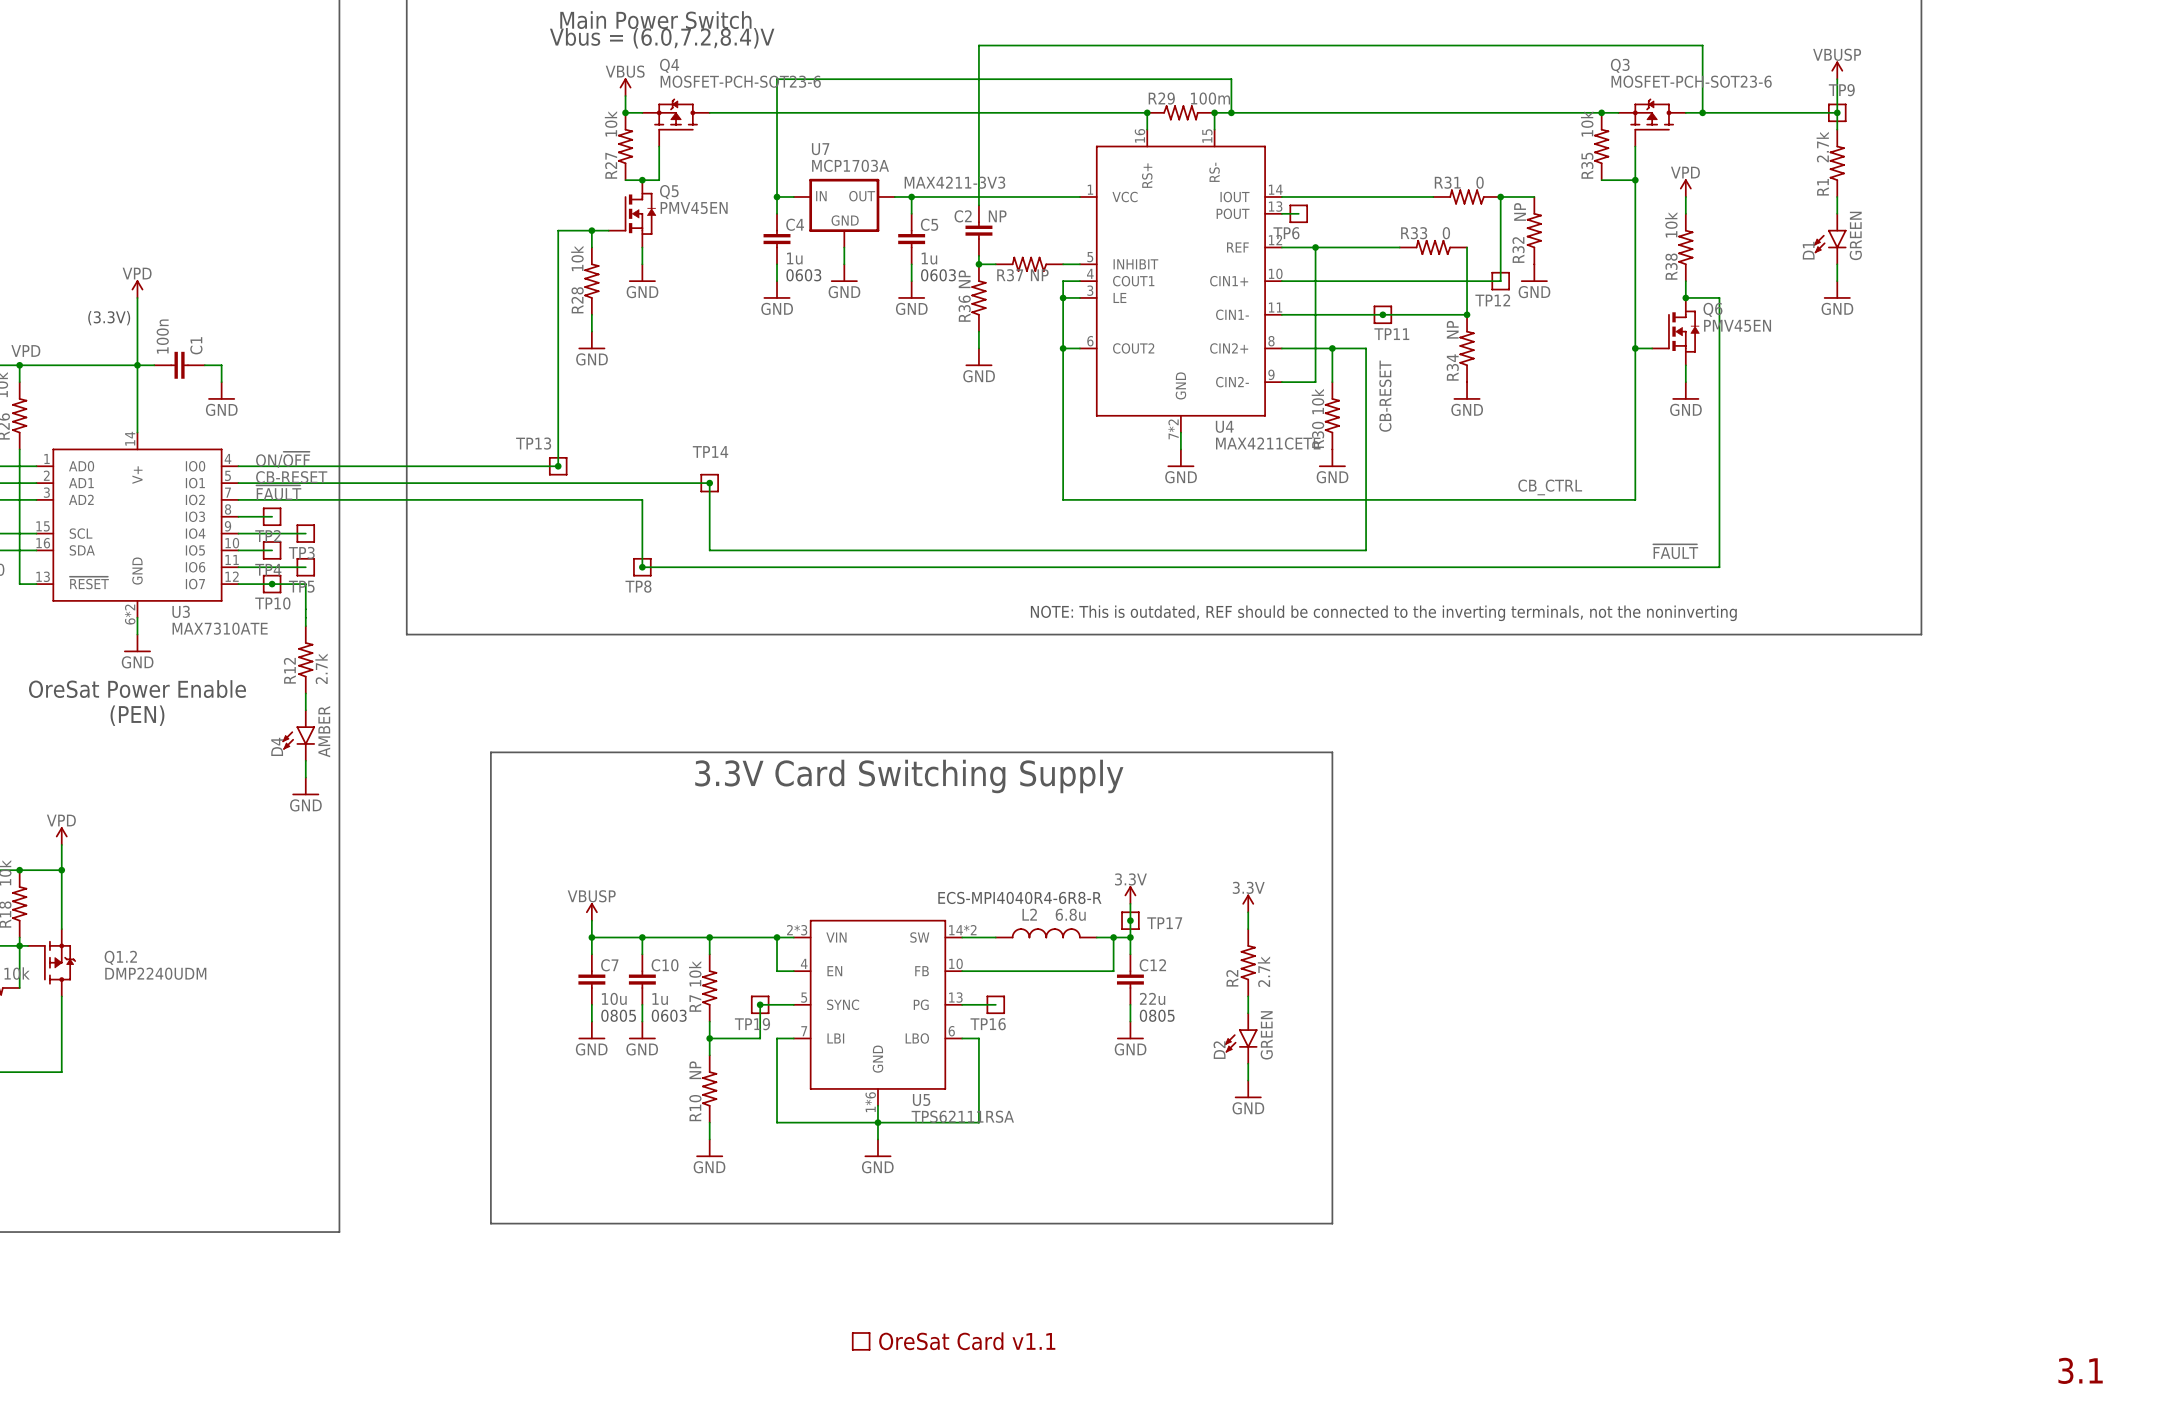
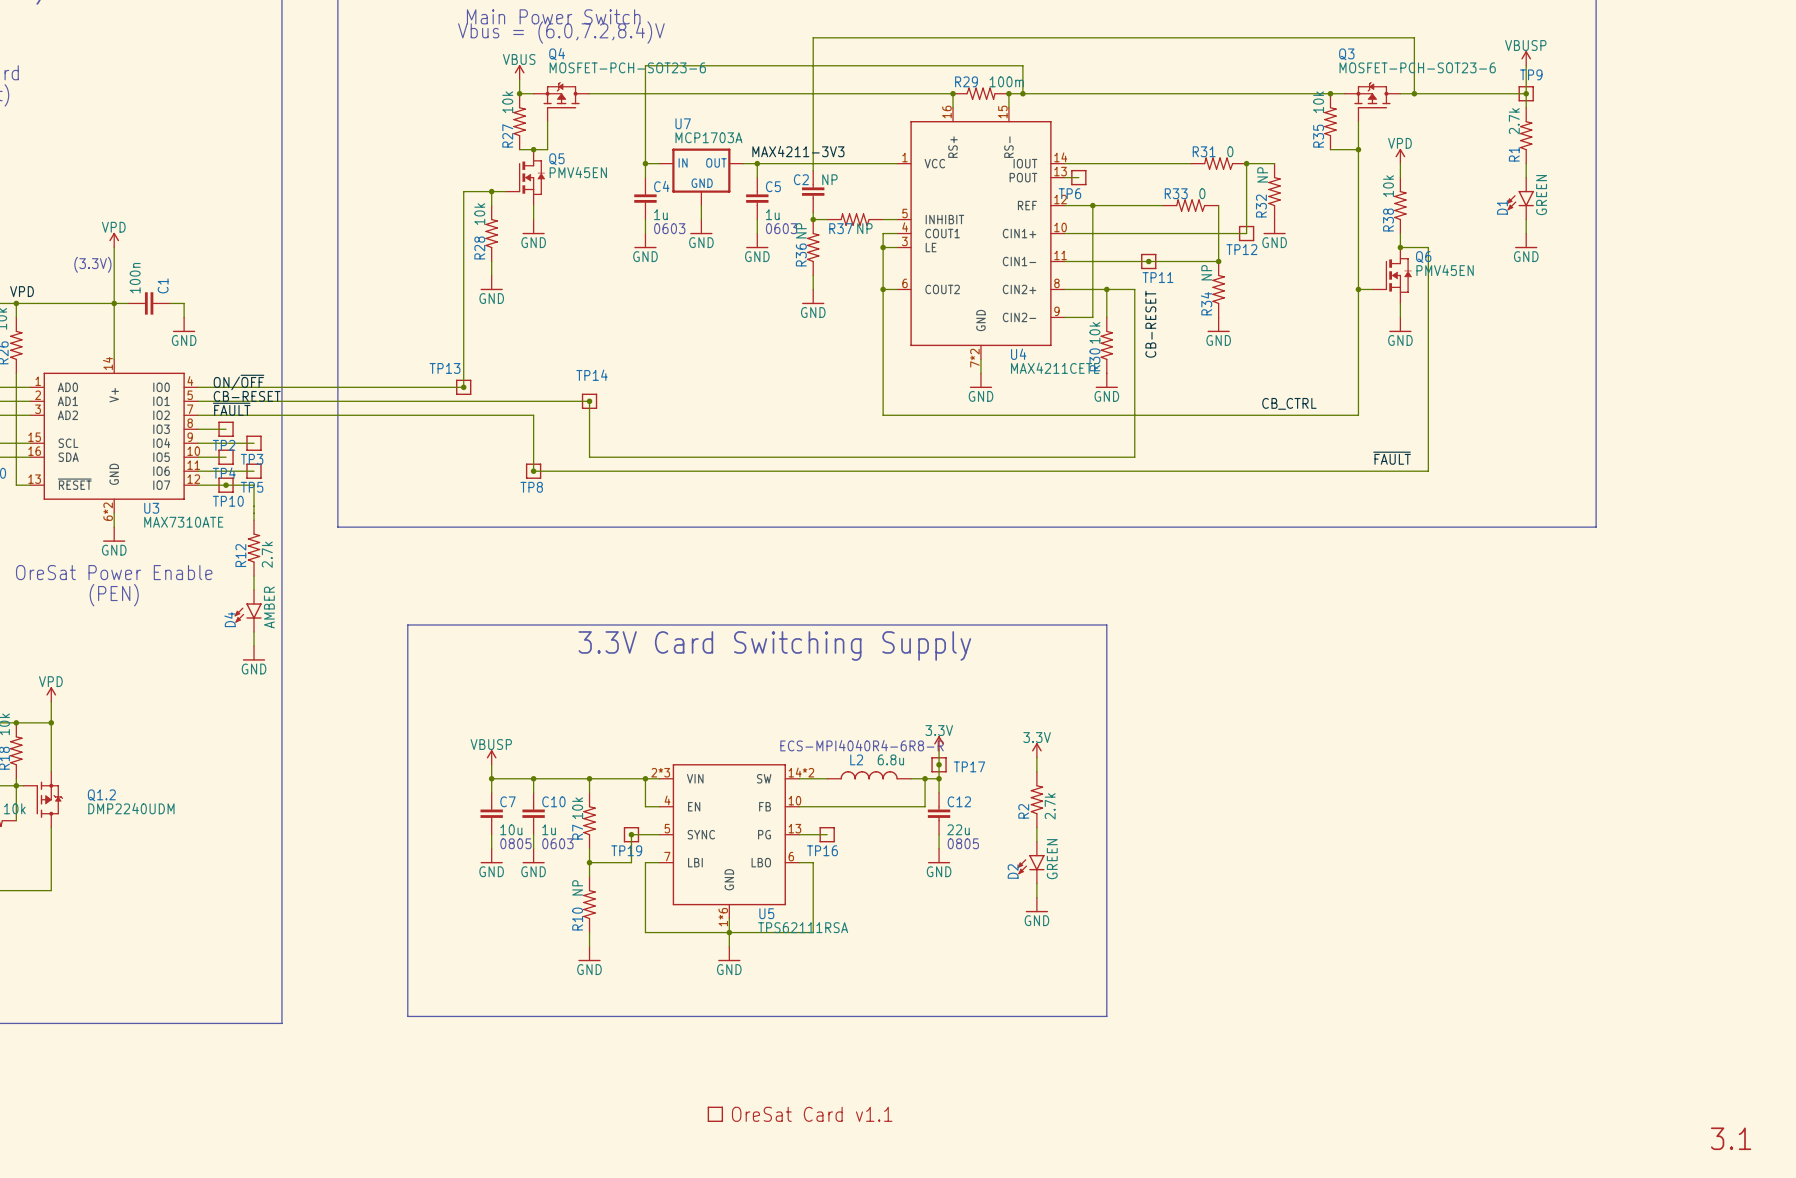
text: NOTE: This is outdated, REF should be connected to the inverting terminals, not the noninverting (1383, 613) -> none

